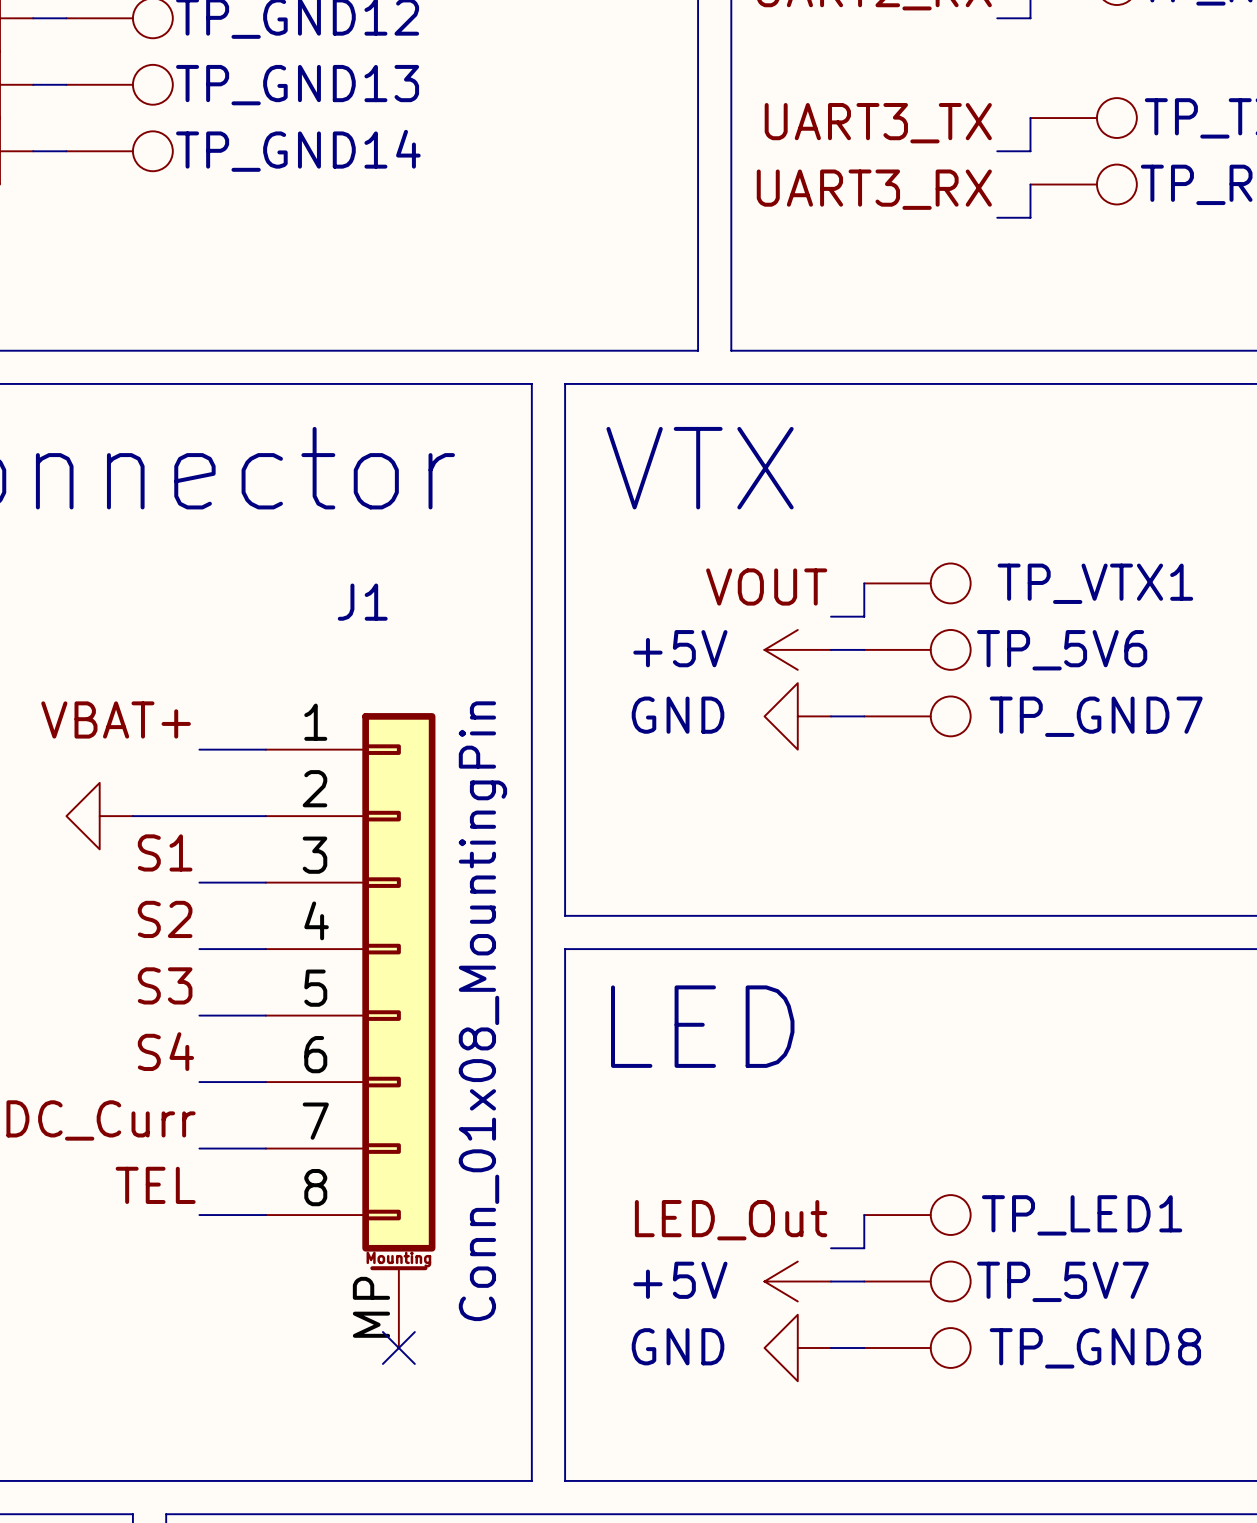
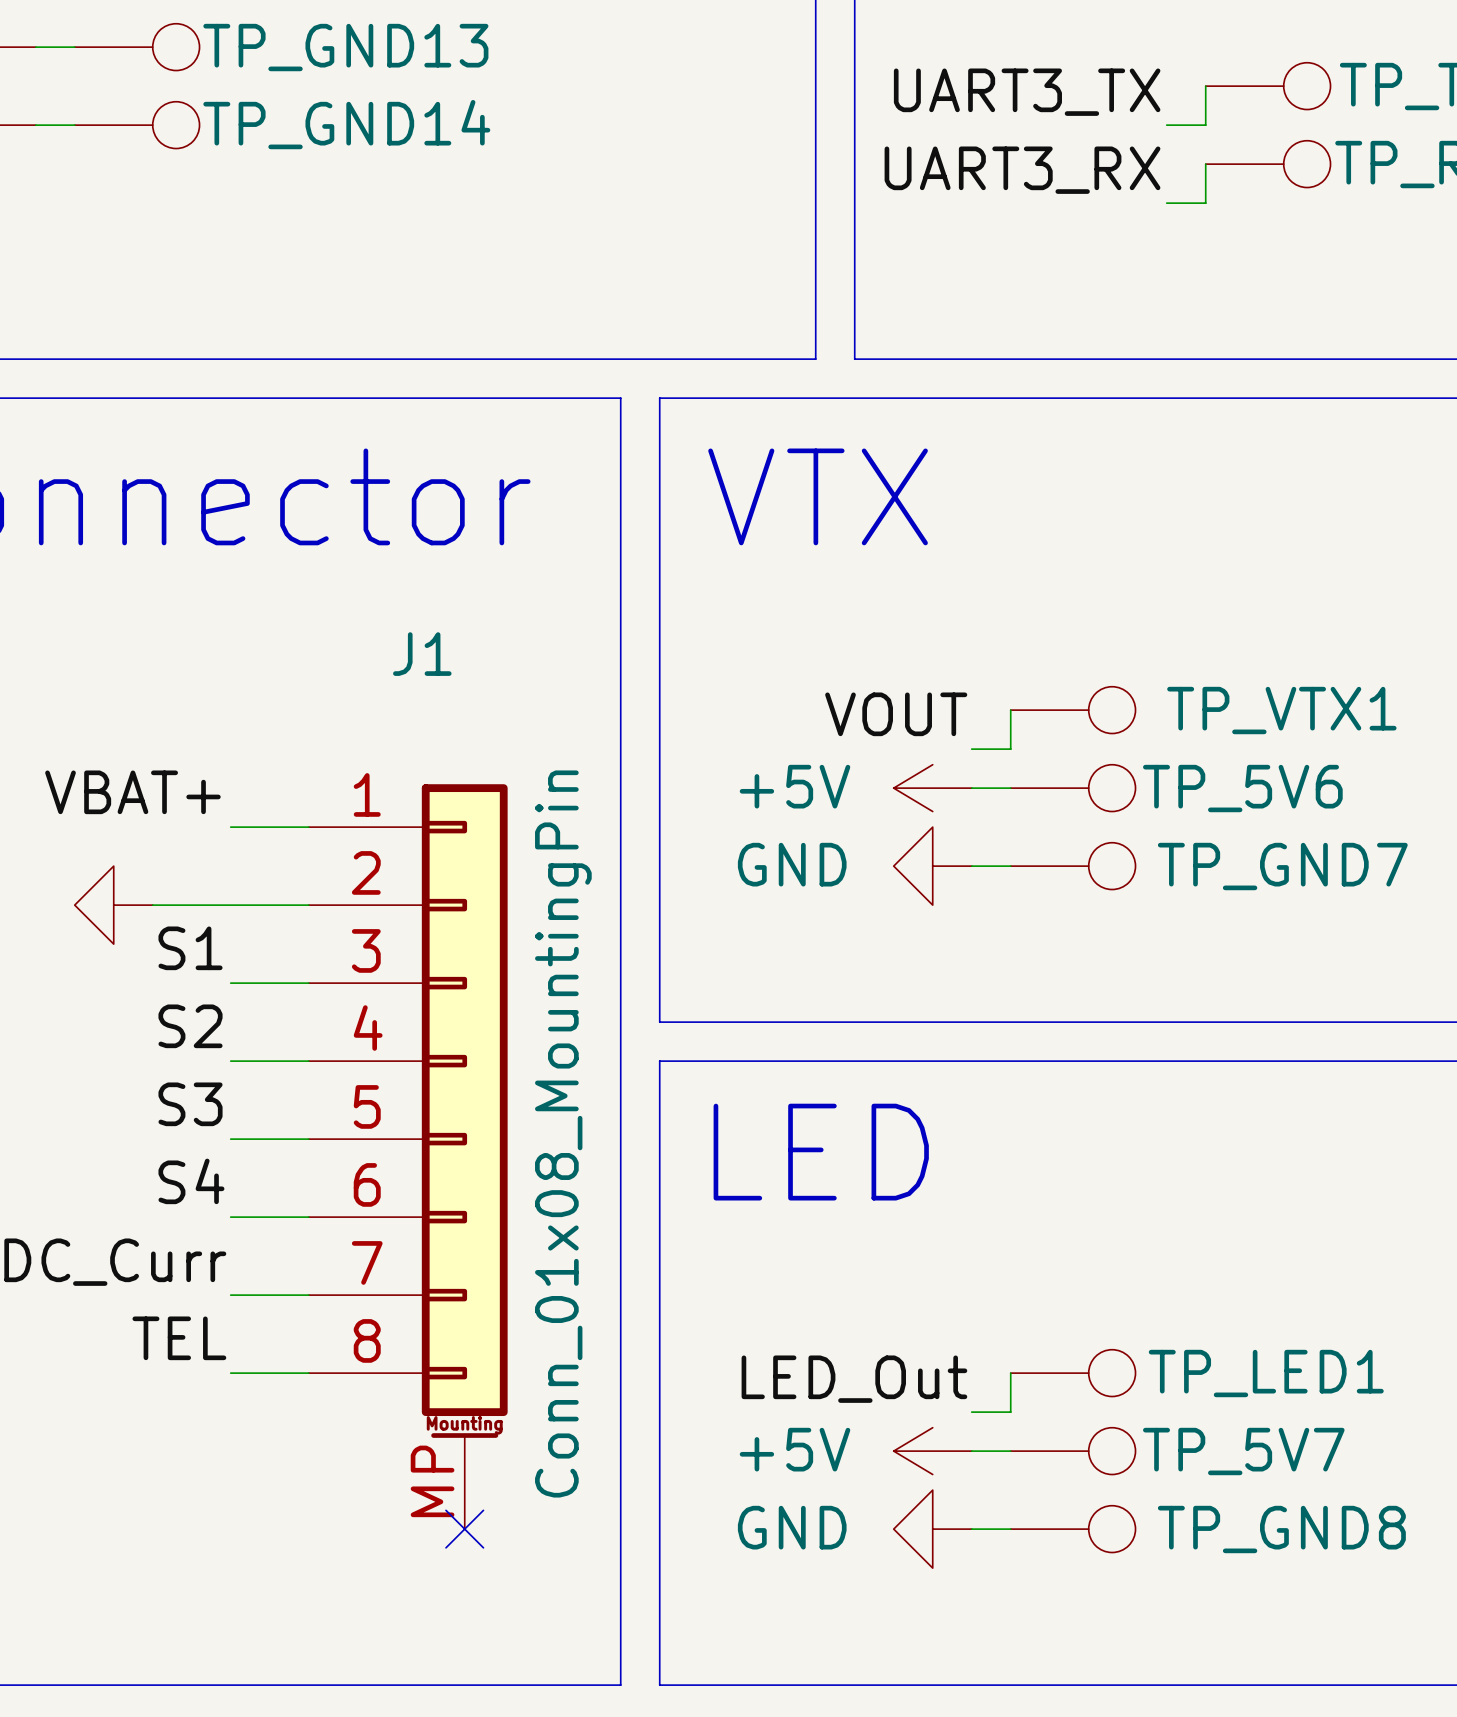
wire: (864, 583) (864, 616) (831, 616) -> none
TP_VTX1: (917, 583) -> none
label position: VOUT (766, 587) -> VOUT (896, 714)
power symbol: +5V (797, 649) -> none
wire: (831, 649) (864, 649) -> (971, 749) (1010, 749) (1010, 710)
TP_5V6 name: TP_5V6 (1062, 650) -> TP_VTX1 (1281, 710)
power symbol: GND (797, 716) -> +5V (932, 788)
TP_GND7 name: TP_GND7 (1096, 716) -> TP_5V6 (1242, 788)
power symbol: none -> GND (932, 866)
wire: none -> (971, 866) (1010, 866)
TP_GND7: none -> (1073, 866)

